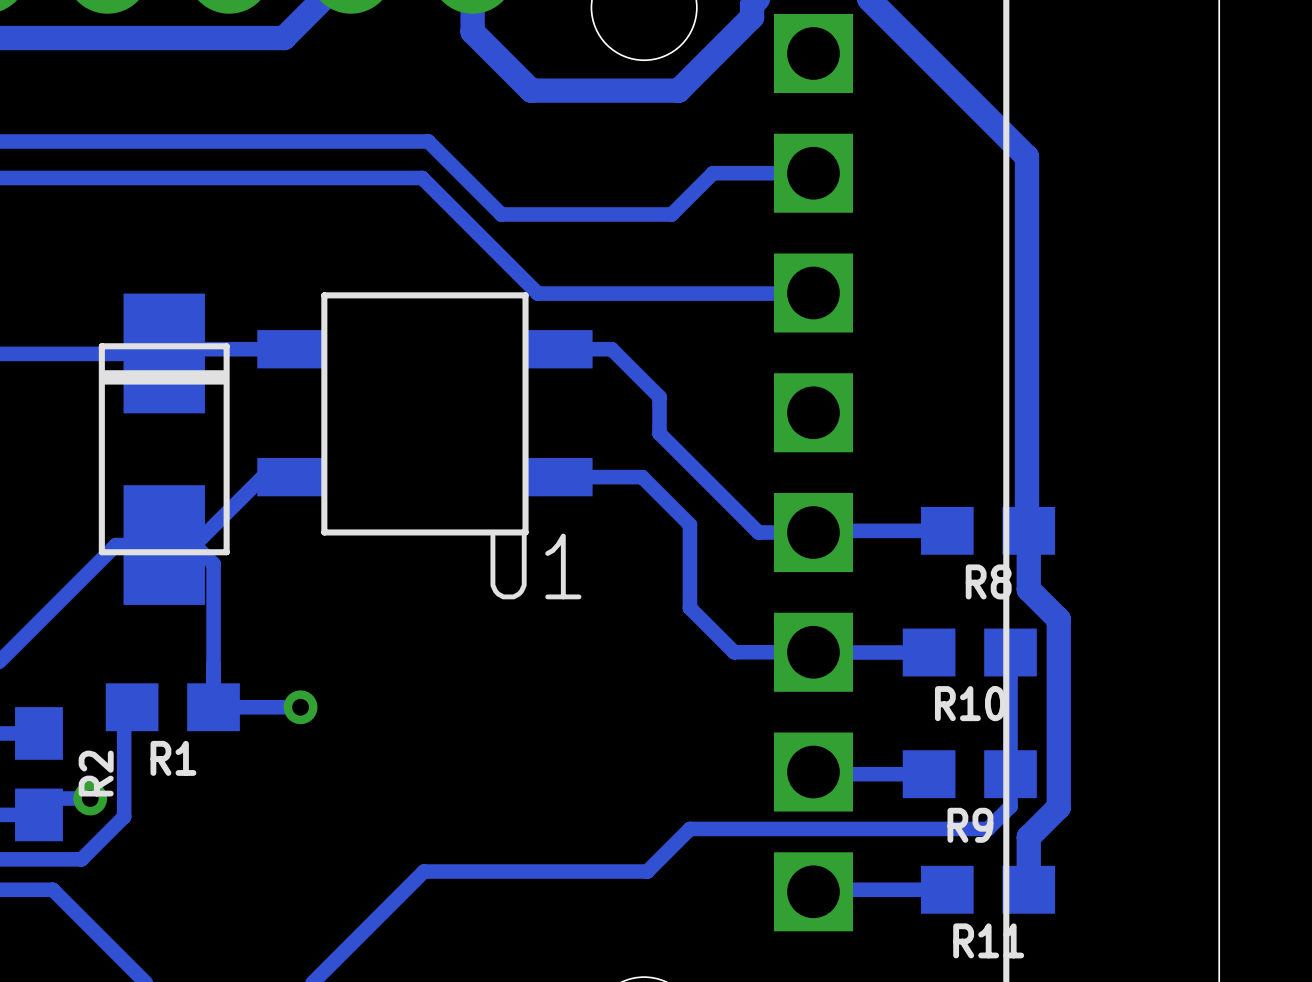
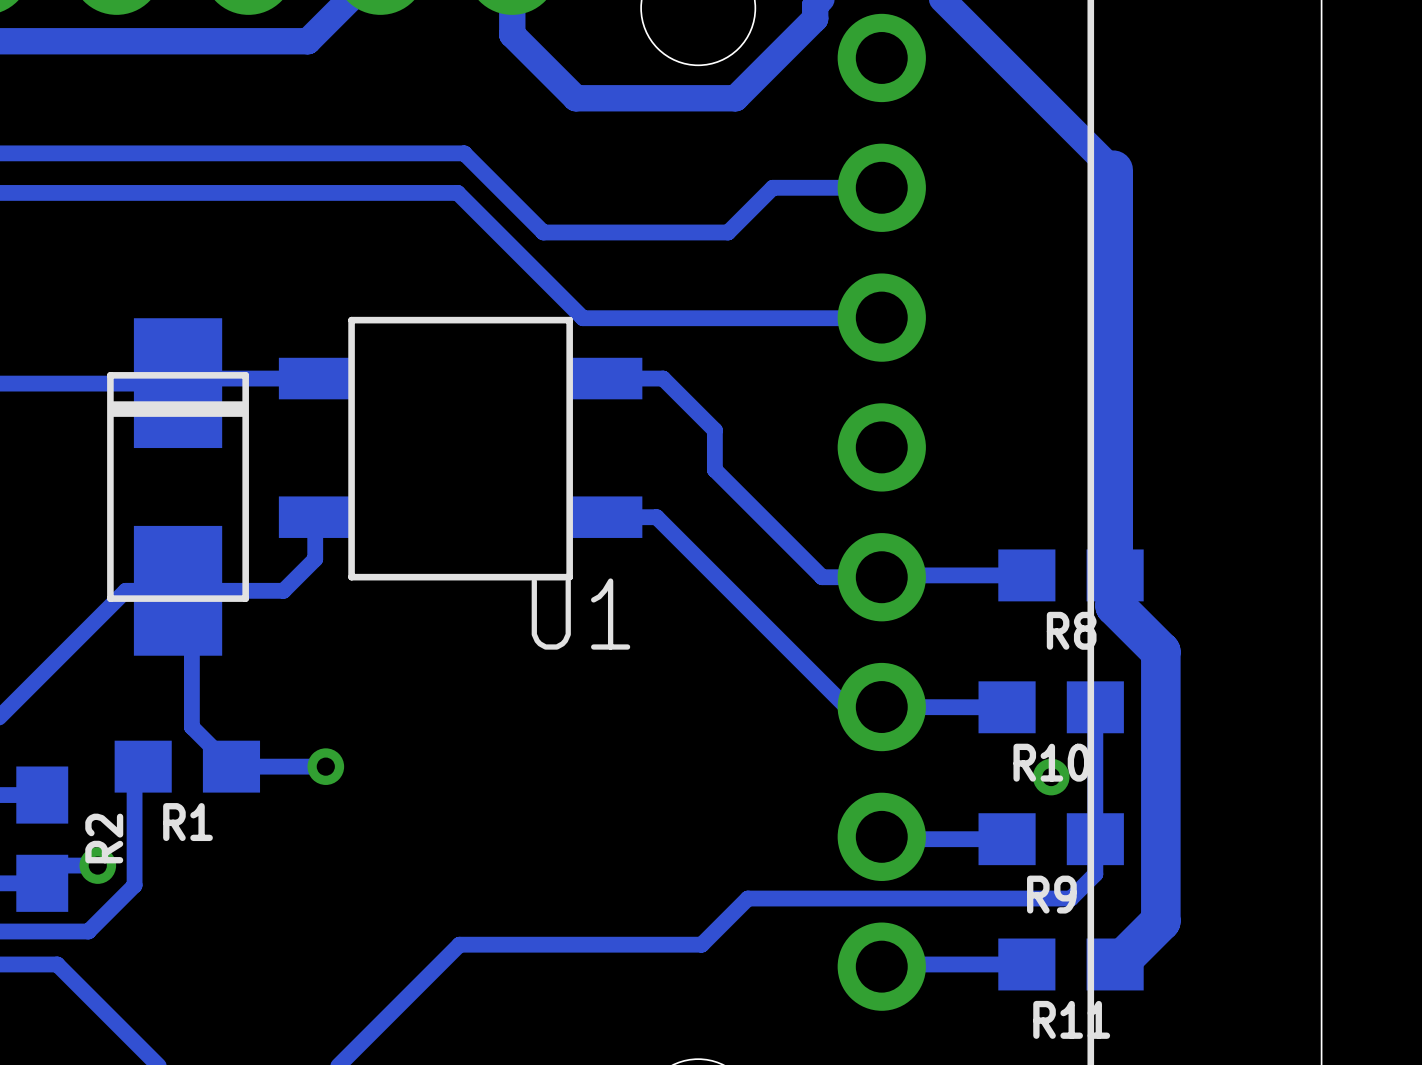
part footprint: [773, 13, 854, 932] -> [837, 13, 926, 1011]
track width: thin (1026, 156) (1026, 529) -> thick (1113, 170) (1113, 573)
track: (290, 477) (262, 477) (194, 545) (213, 563) (213, 707) -> (191, 590) (191, 727) (231, 766)
track: none -> (315, 517) (315, 559) (283, 590) (211, 590)
track: (605, 477) (642, 477) (689, 524) (689, 608) (734, 652) (929, 652) -> (656, 517) (846, 707) (1007, 707)
track: (1028, 559) (1028, 589) (1058, 619) (1058, 807) (1028, 837) (1028, 889) -> (1115, 606) (1160, 651) (1160, 921) (1117, 964) (1115, 964)
via: none -> (1051, 777)

